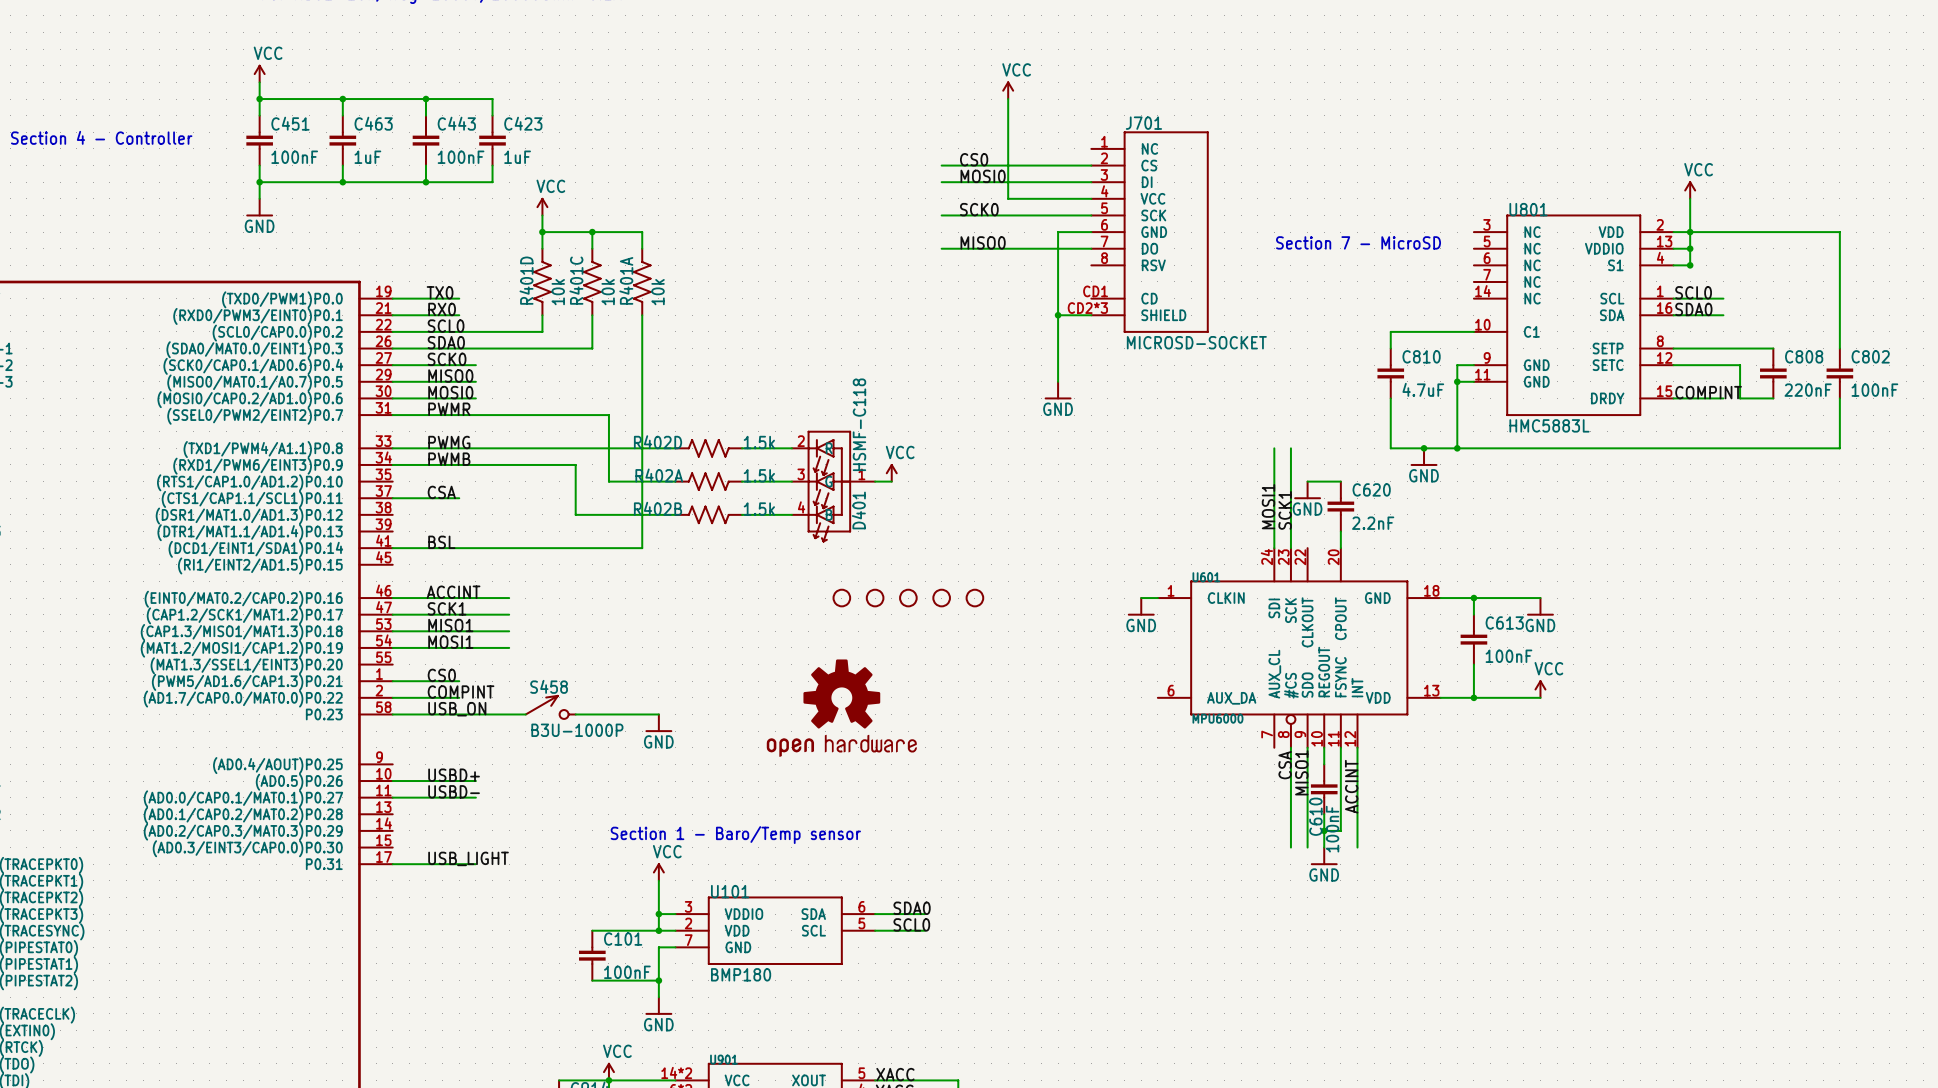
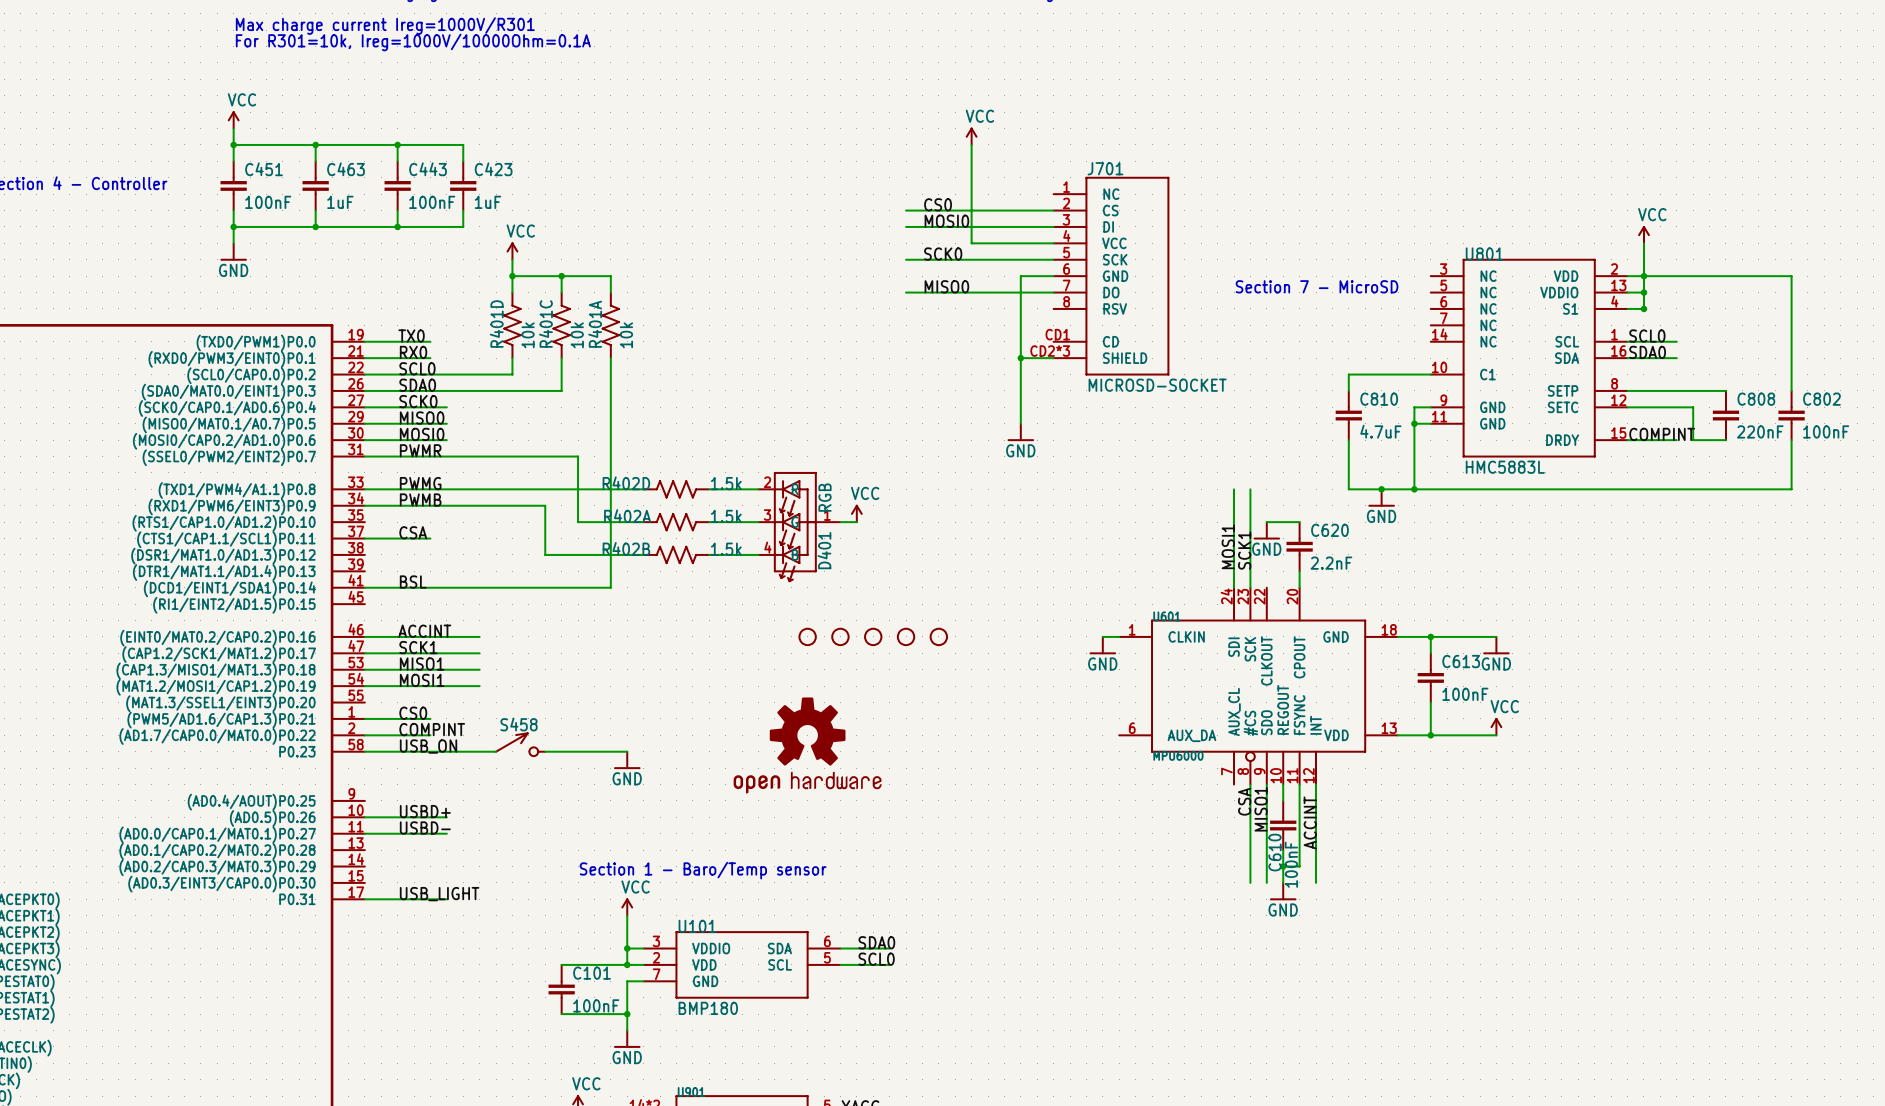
D401 value: HSMF-C118 (859, 424) -> RGB (825, 497)
S458 value: B3U-1000P (577, 730) -> none

